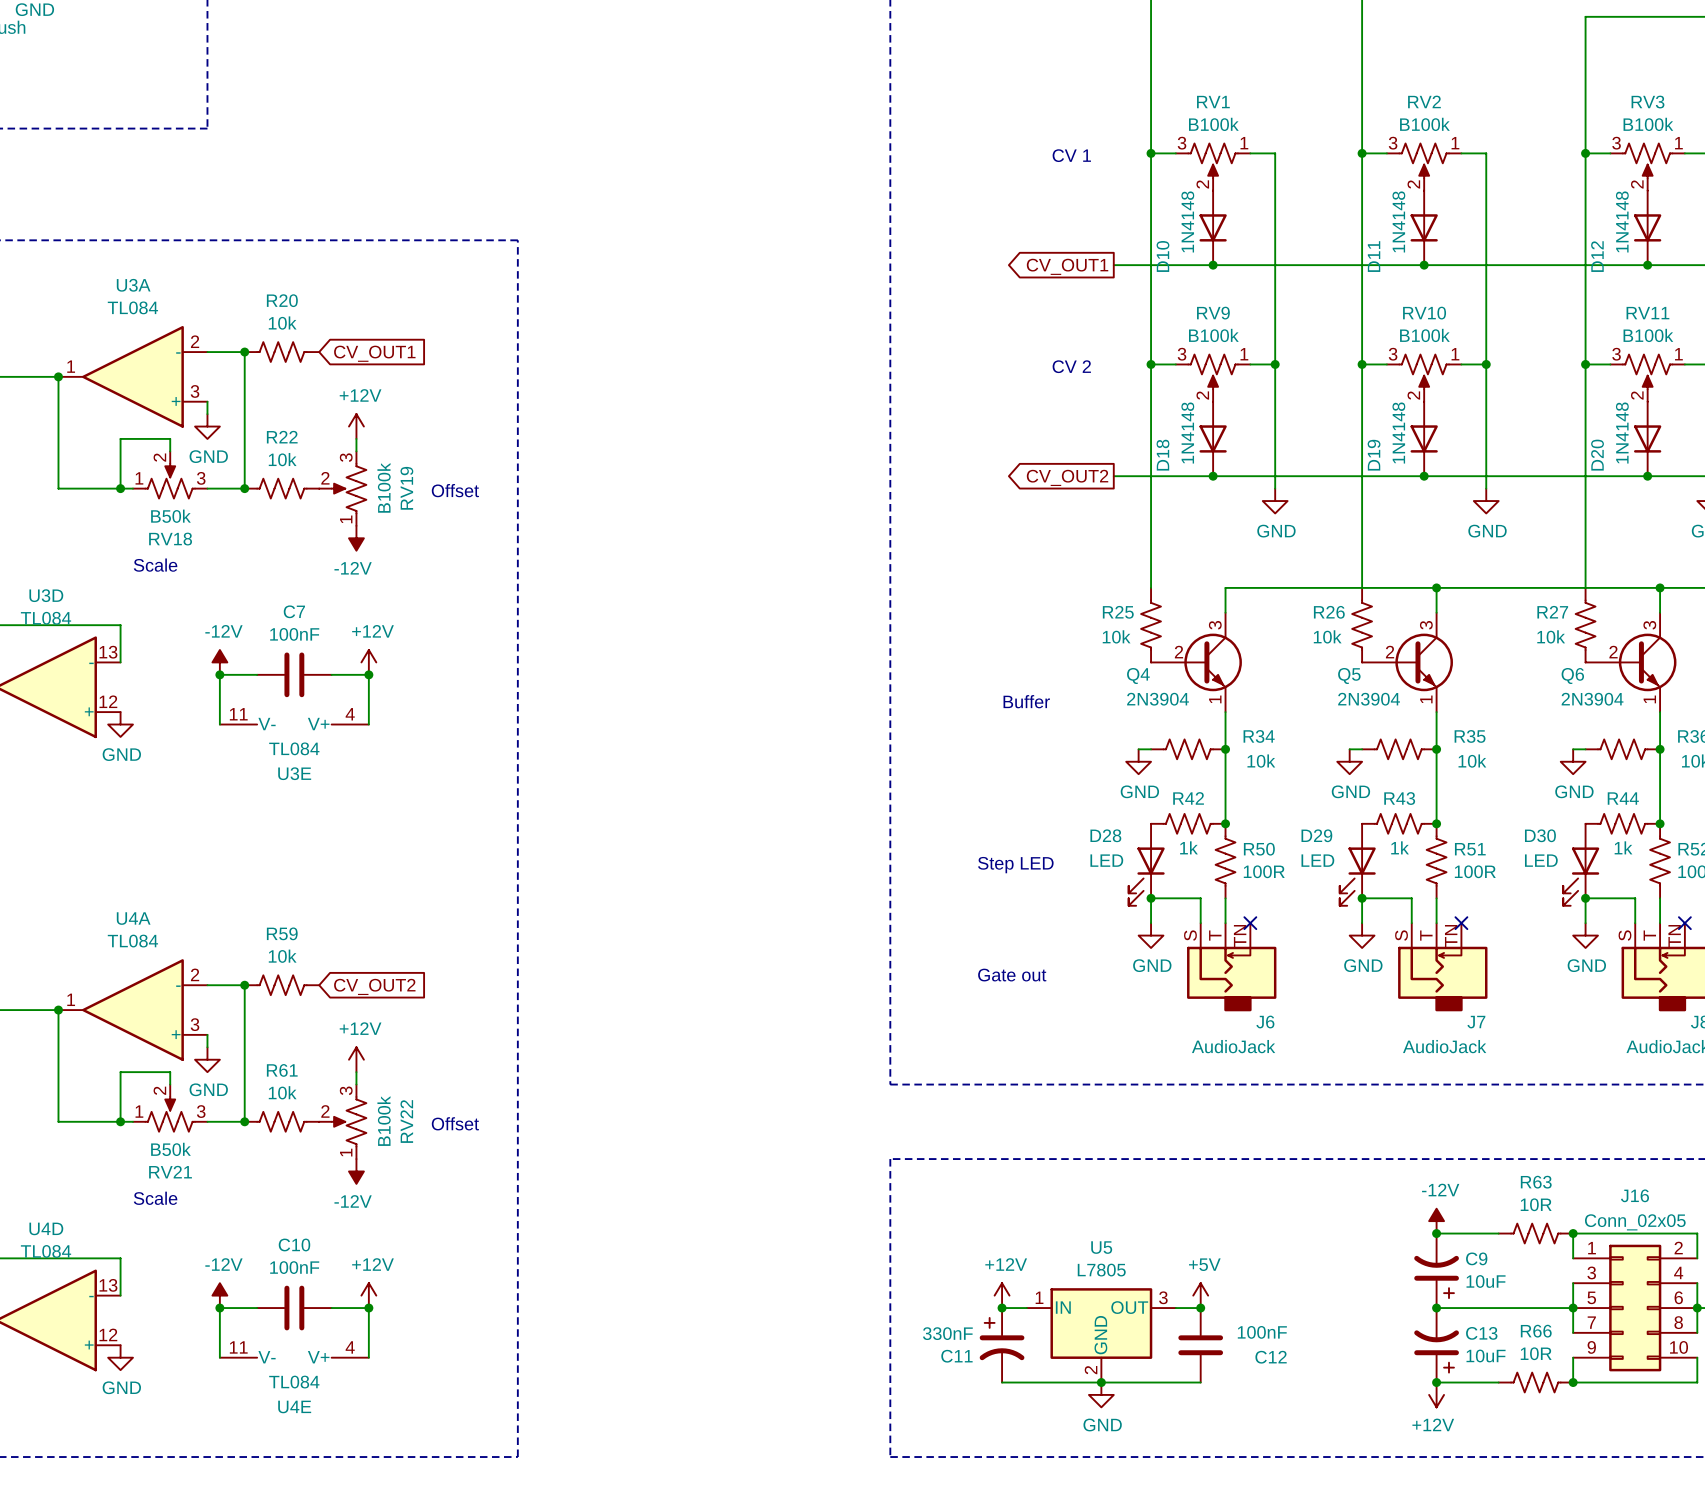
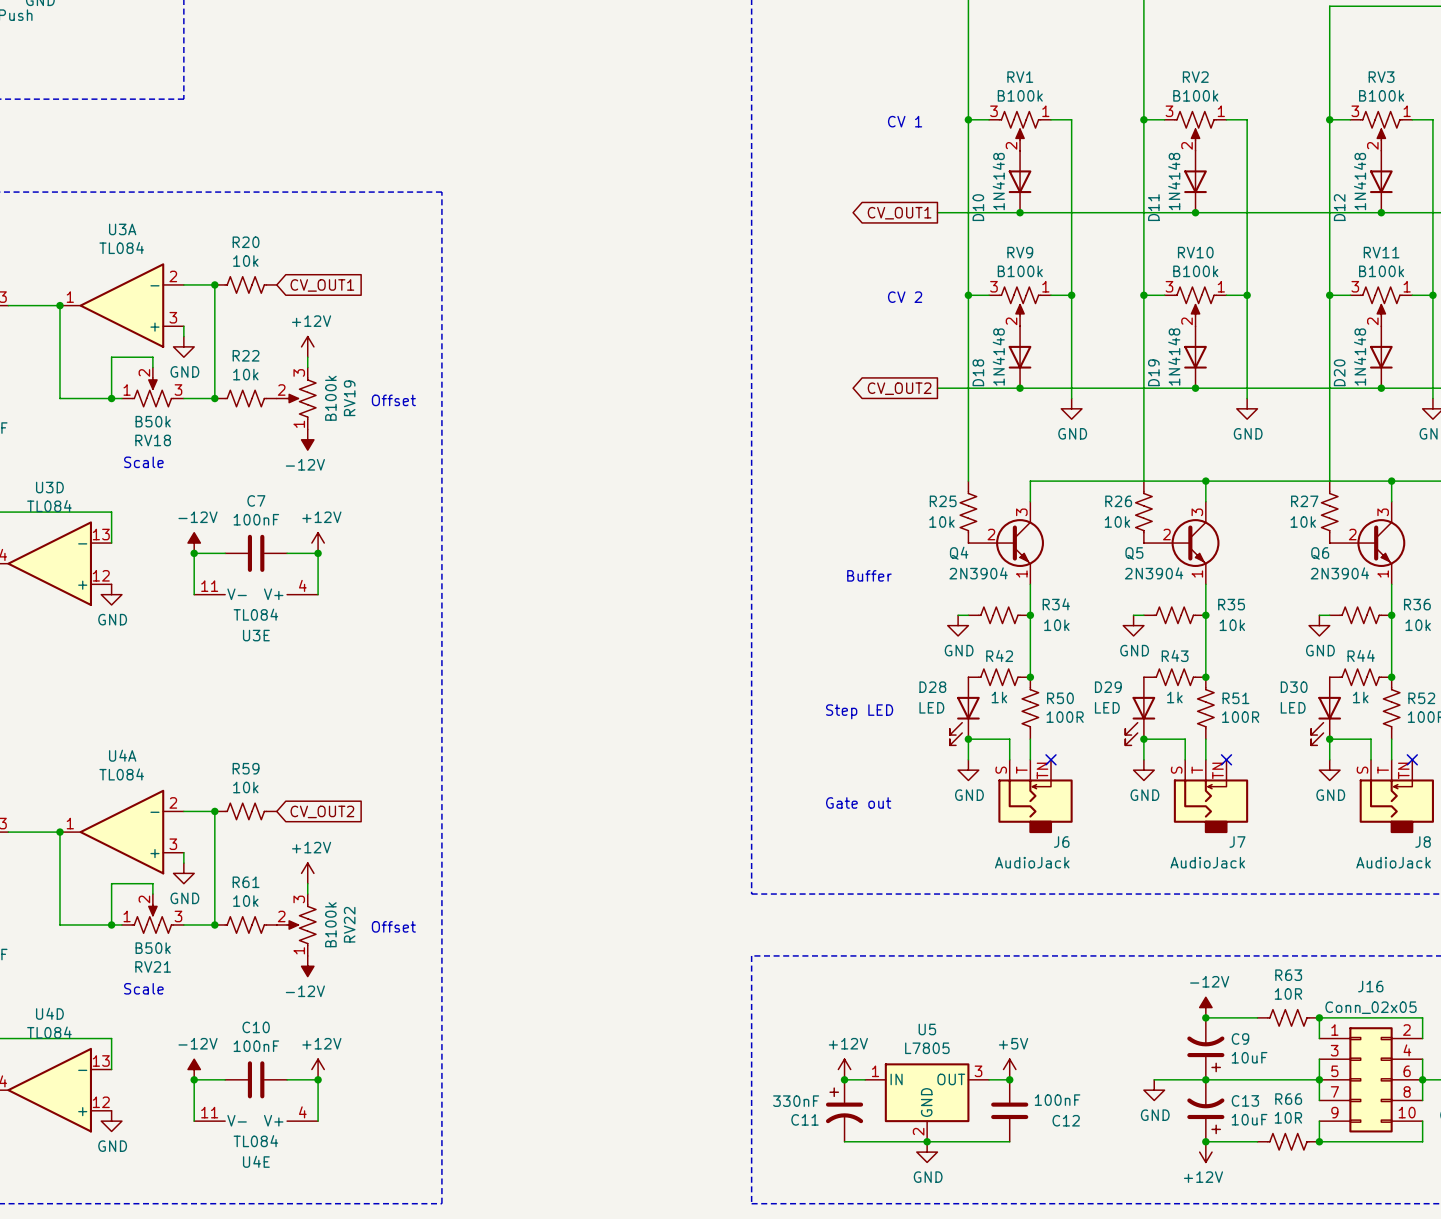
wire: none -> (1154, 1079) (1205, 1079)
power symbol: none -> GND (1154, 1090)

